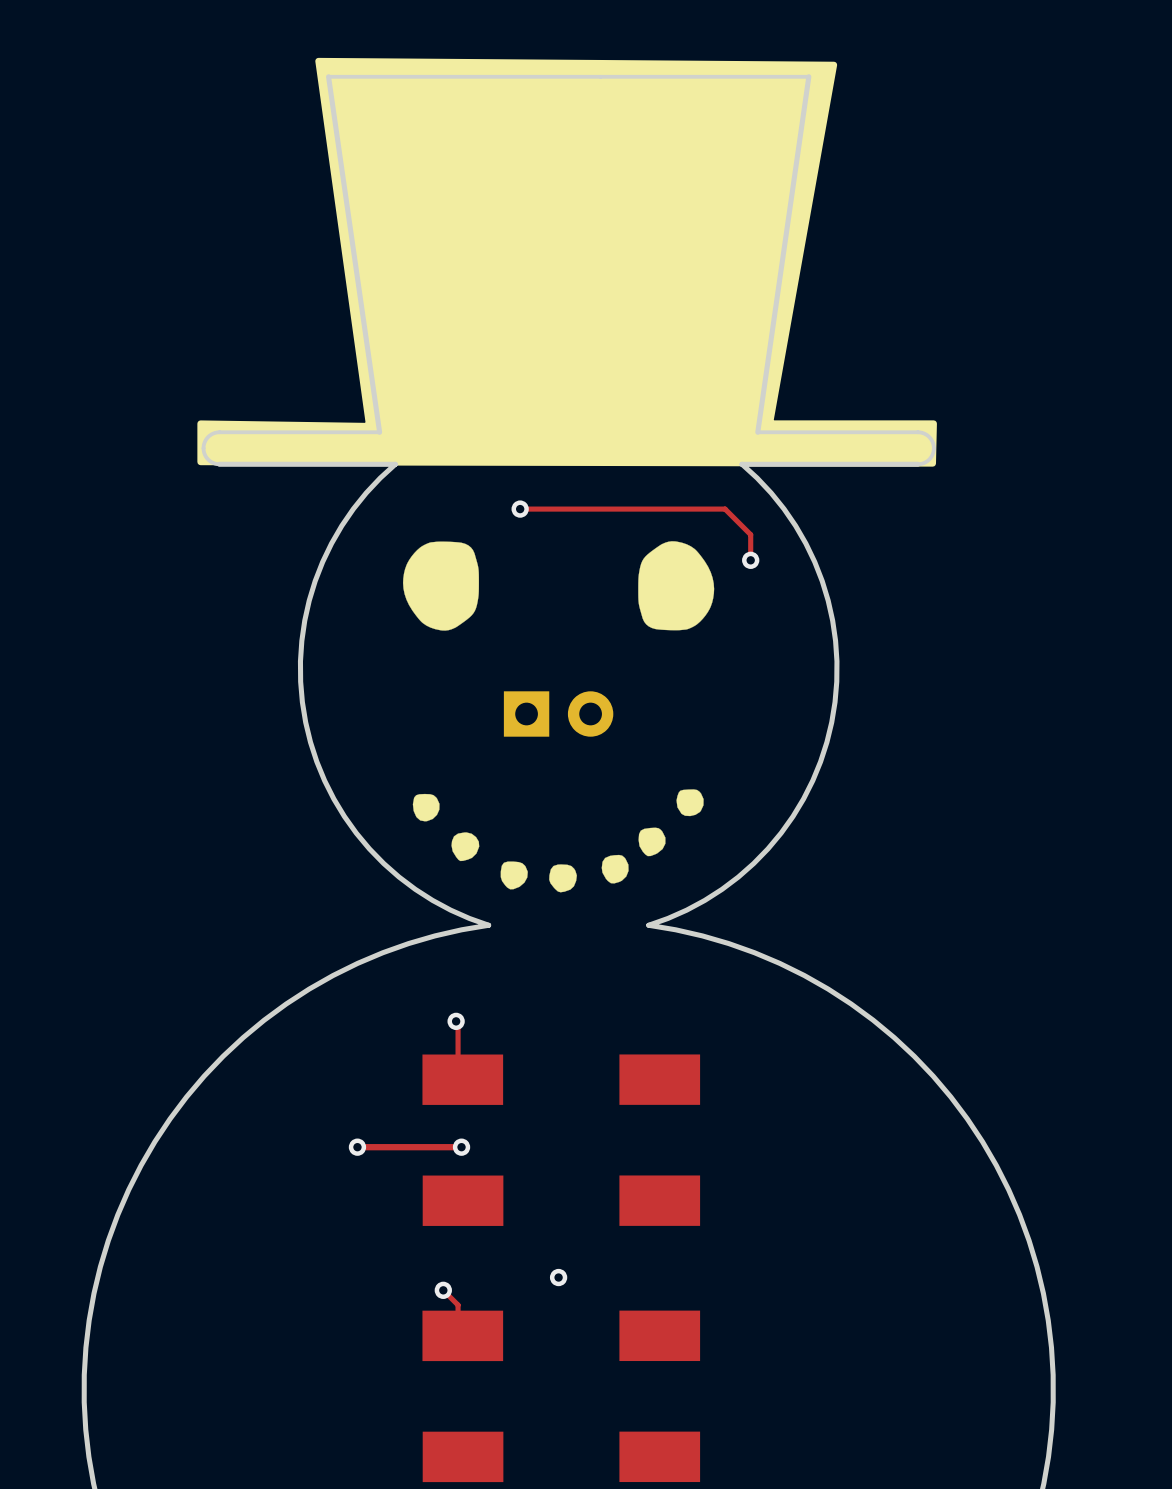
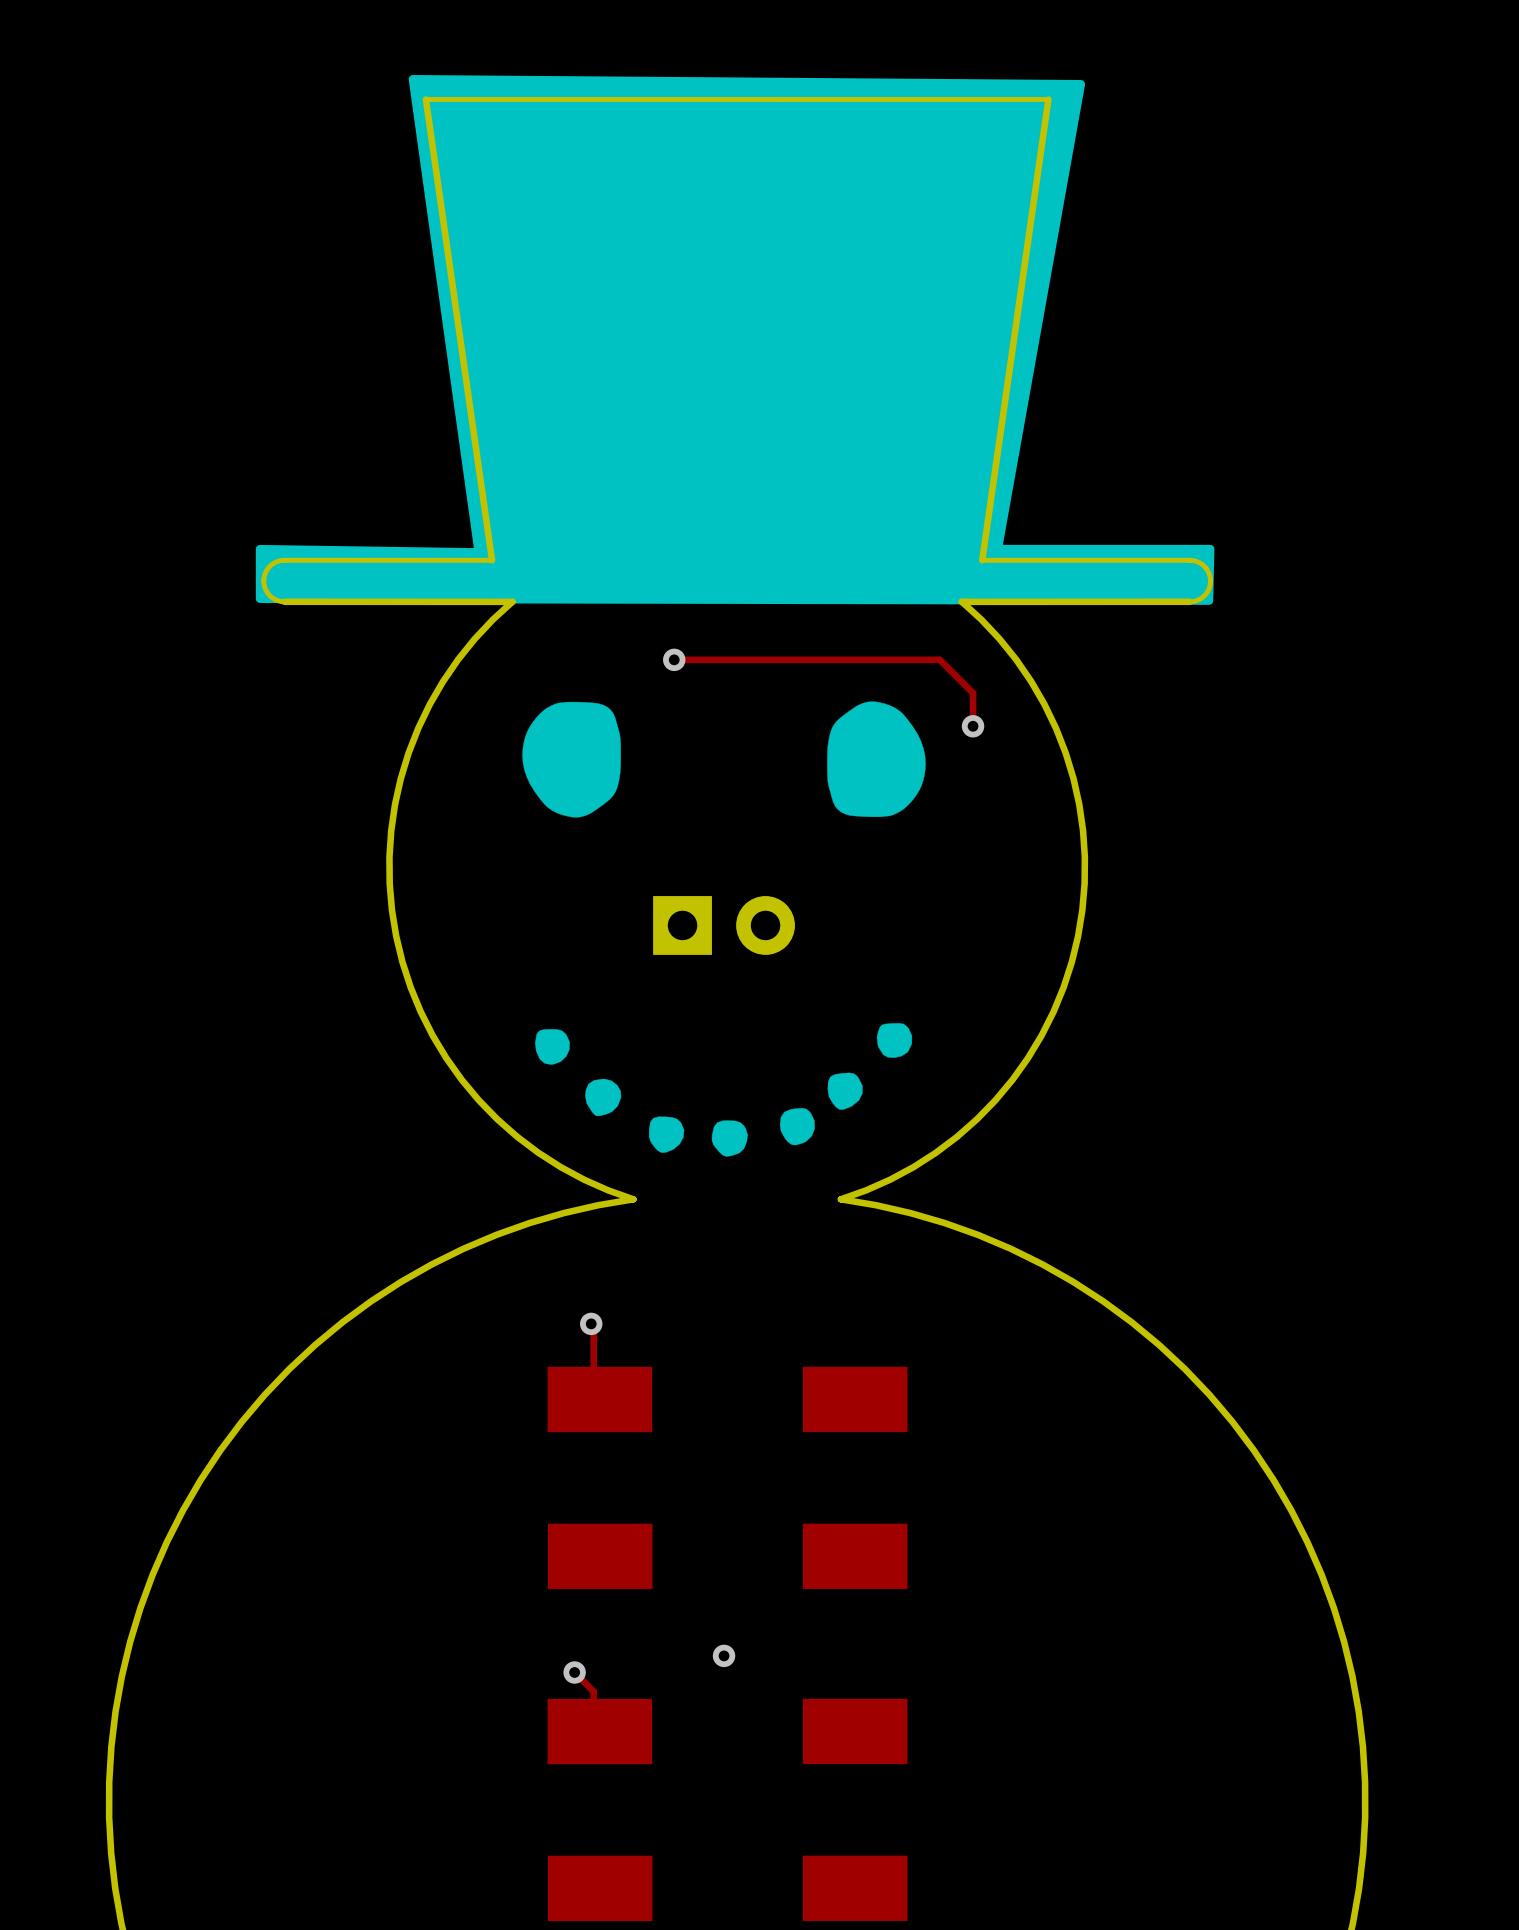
track: (357, 1147) (461, 1147) -> none
via: (357, 1147) -> none
via: (461, 1147) -> none

